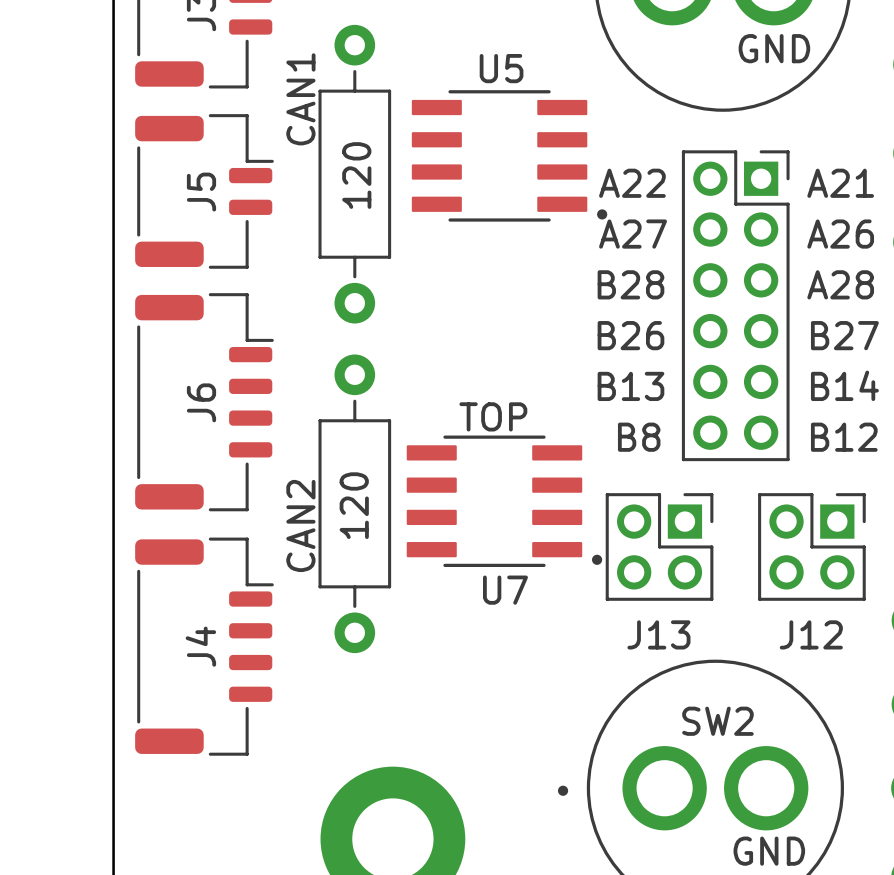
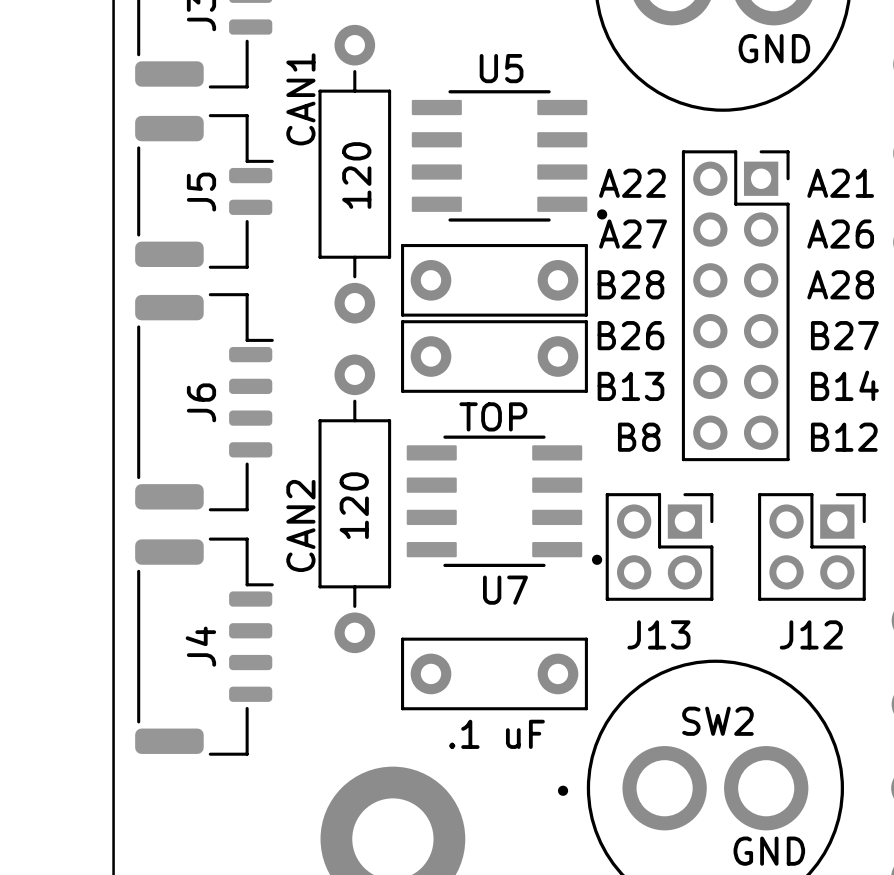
part: none -> (494, 280)
part: none -> (494, 356)
part: none -> (494, 673)
text: none -> .1 uF (496, 734)

